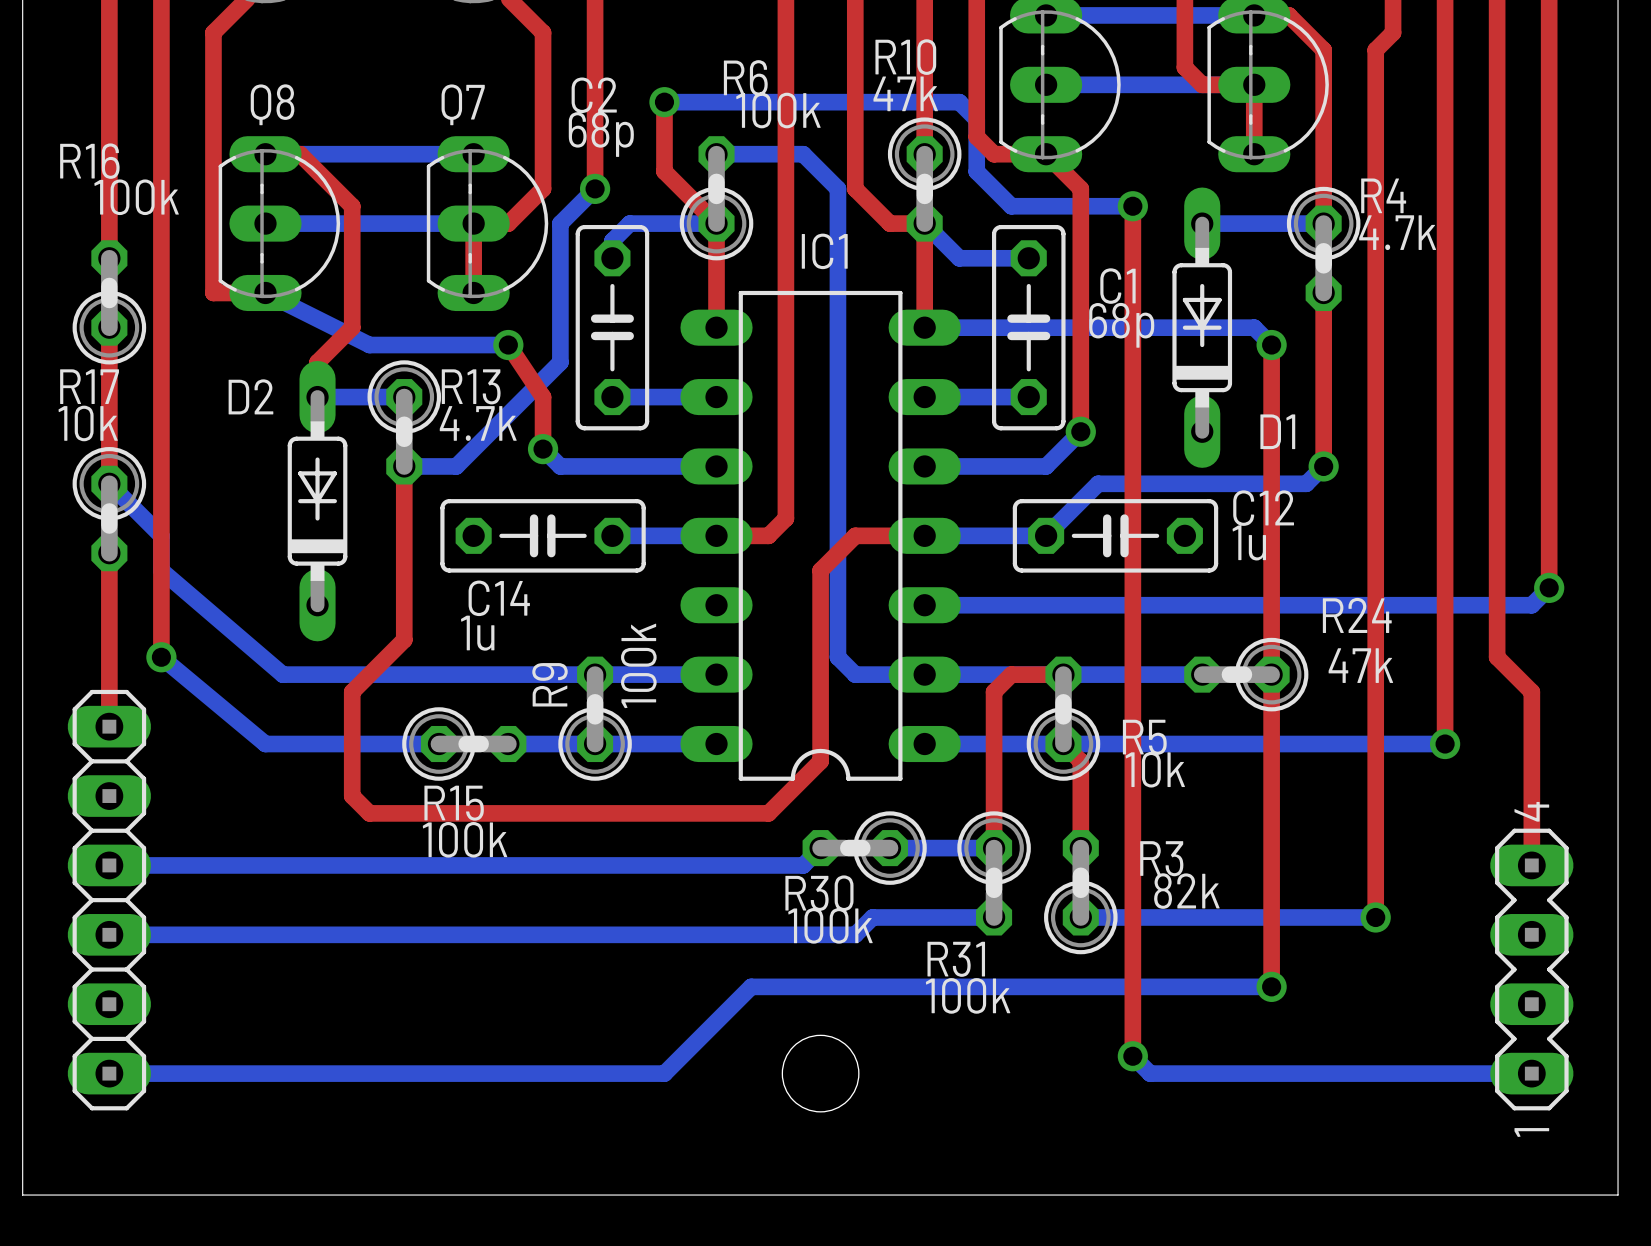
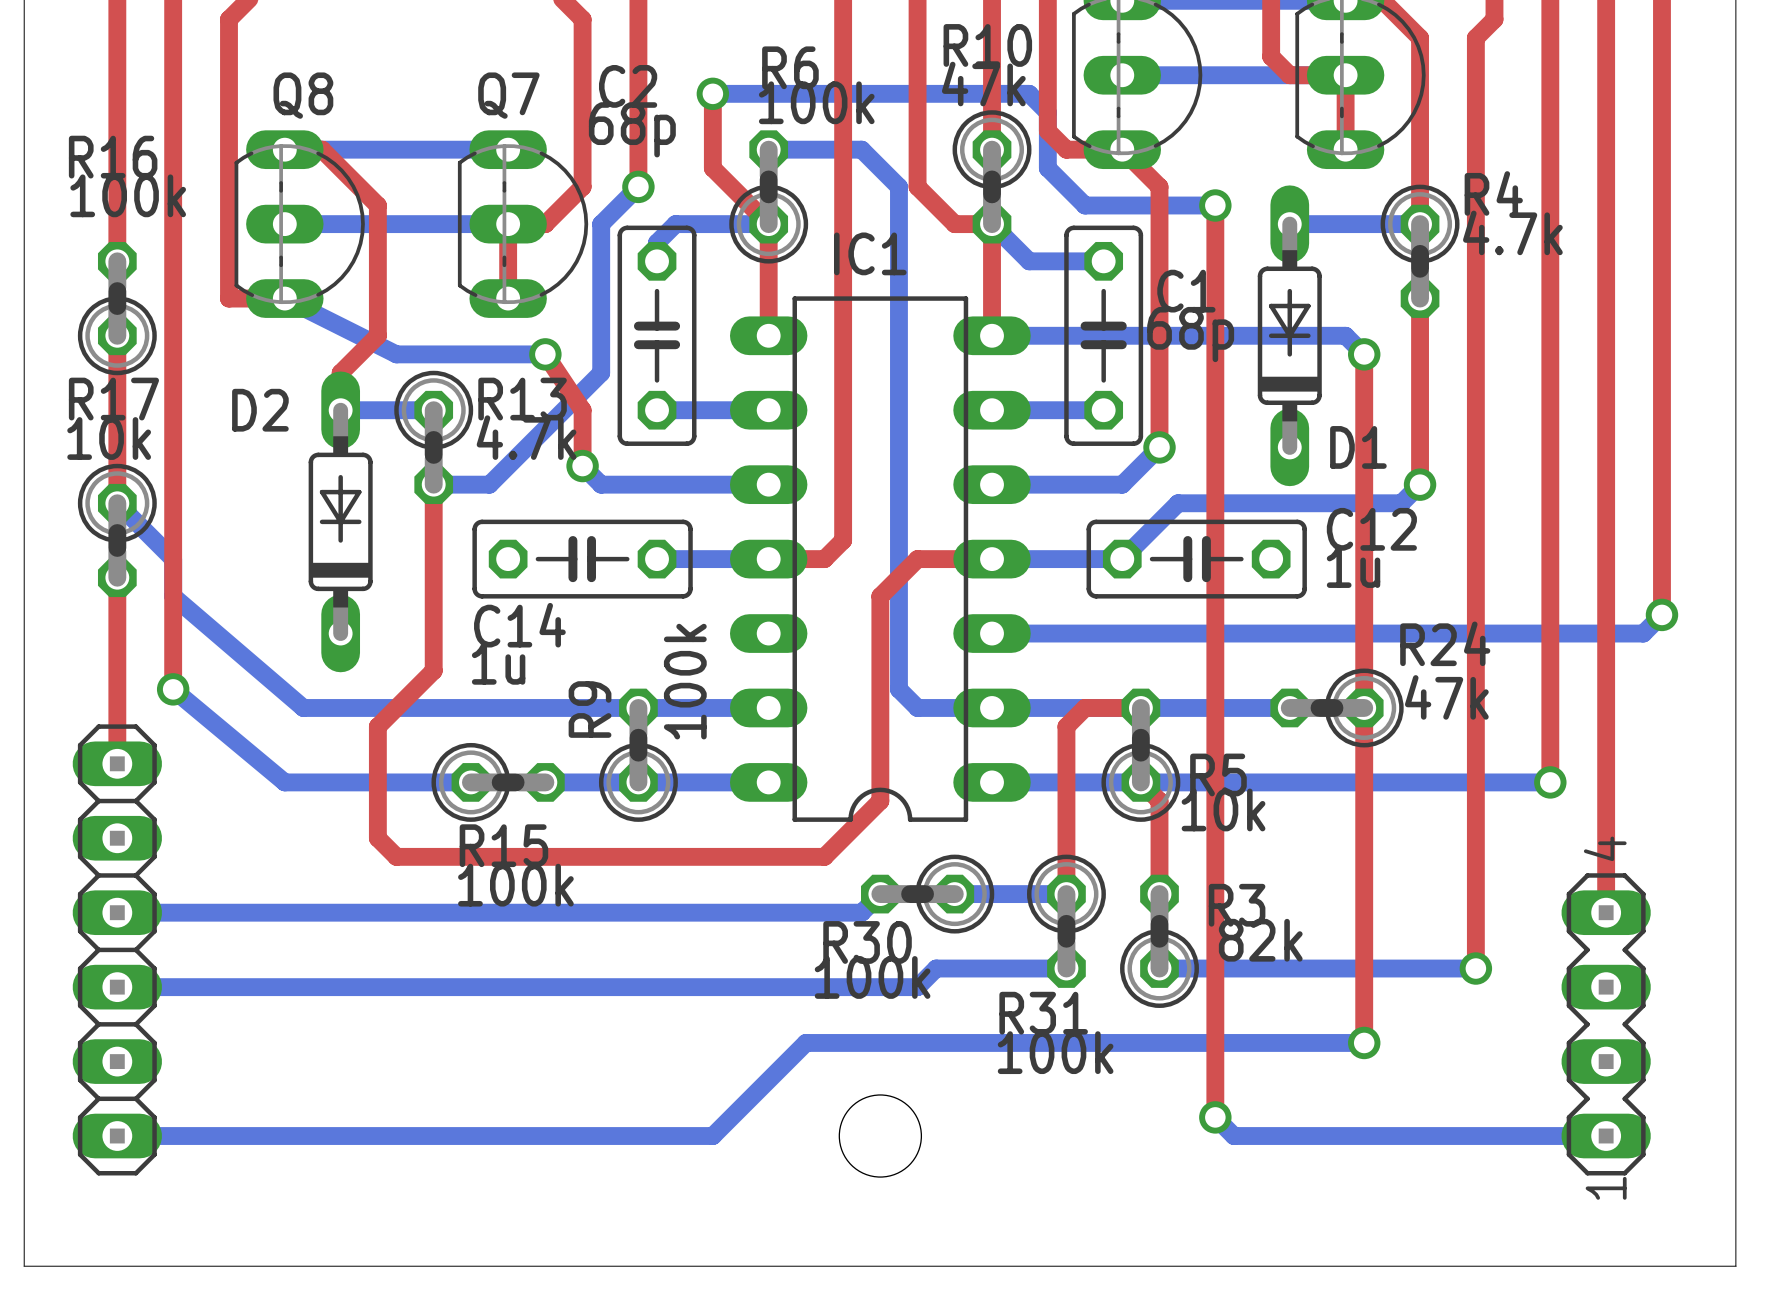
top track: (1497, 657) (1531, 691) (1531, 865) -> (1606, 689) (1606, 912)
part position: (1531, 969) -> (1606, 1024)

